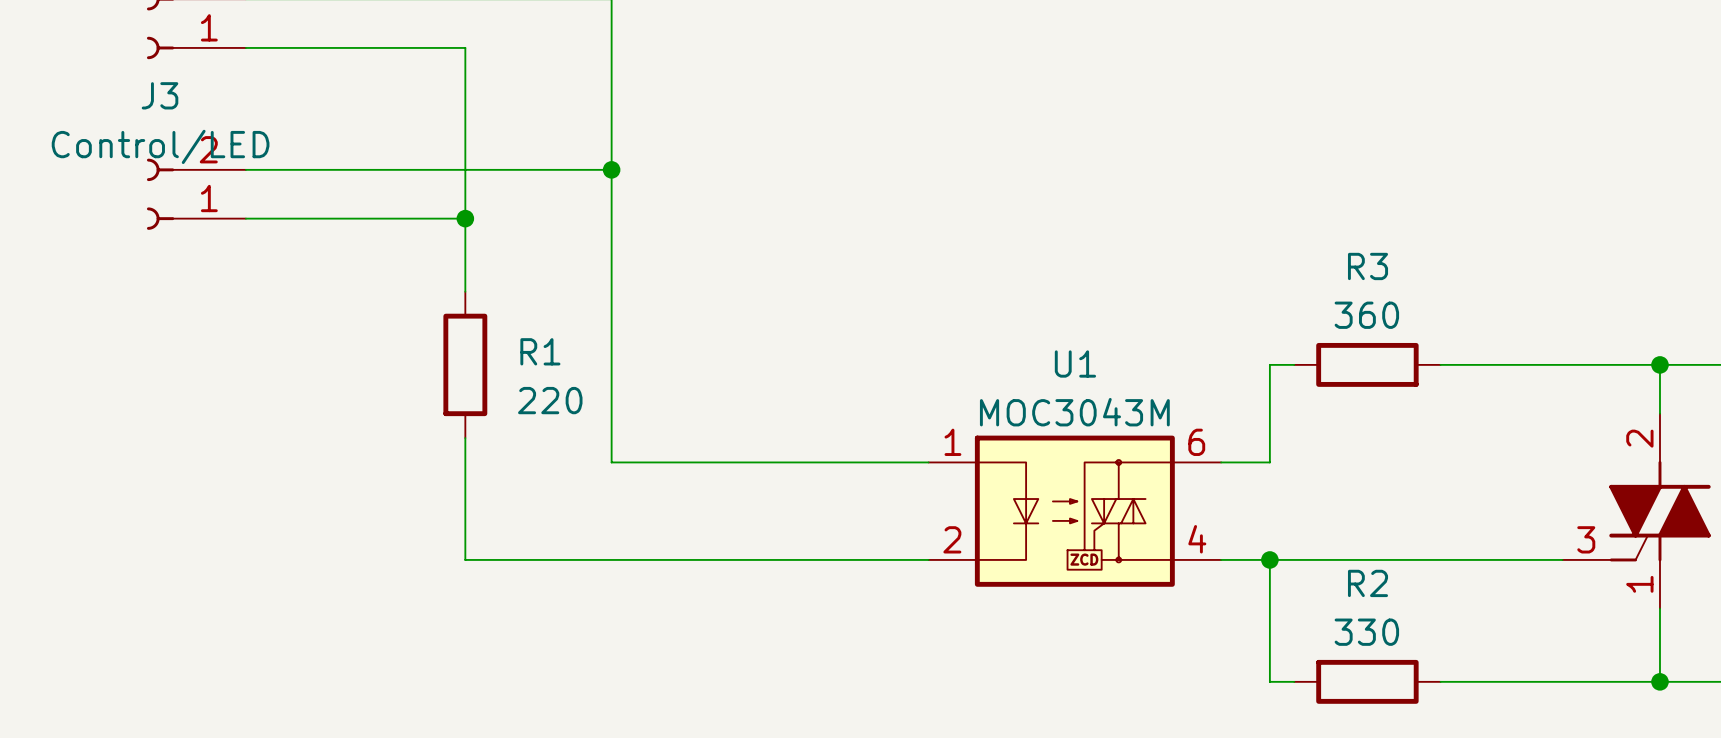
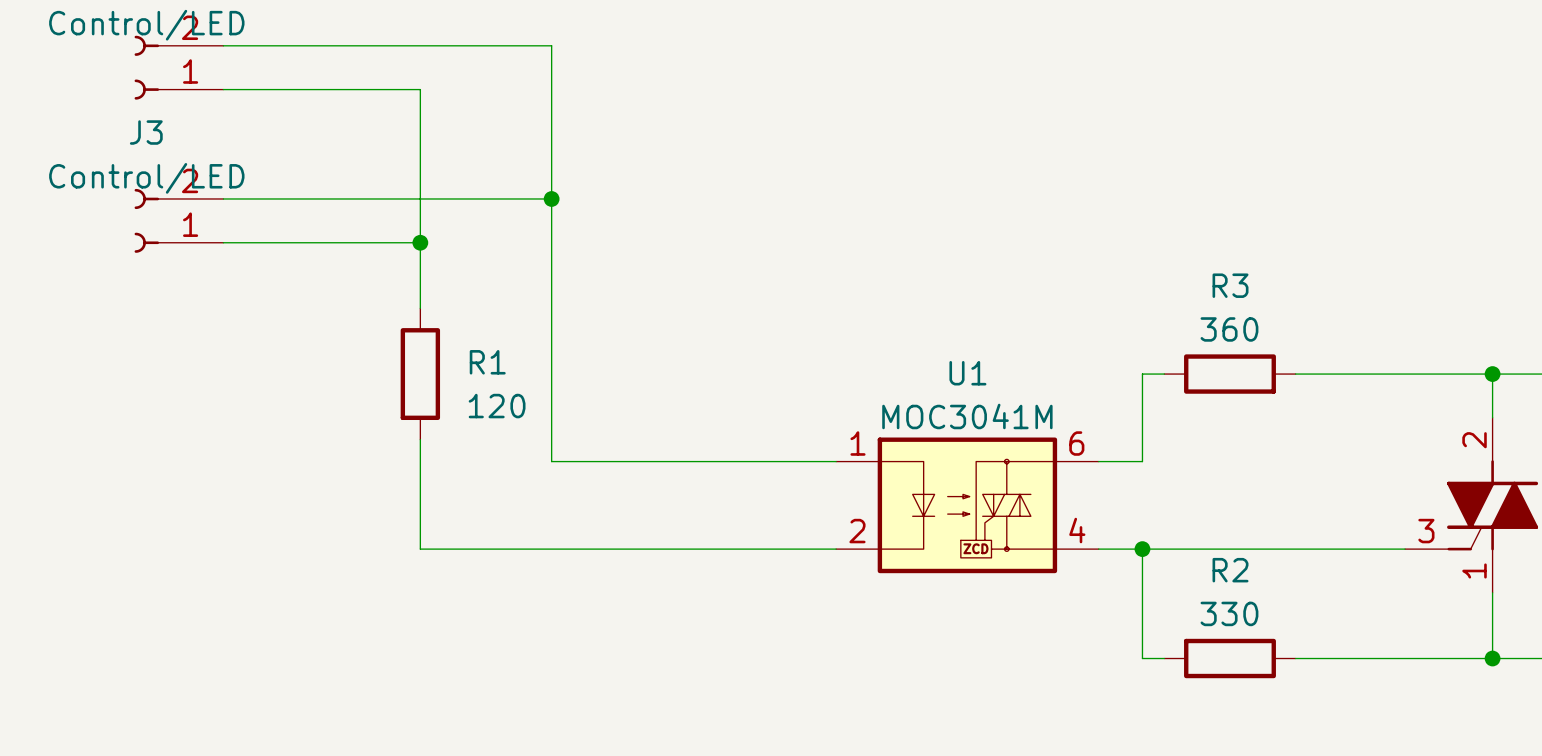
R1 value: 220 (550, 400) -> 120 (497, 406)
U1 value: MOC3043M (1074, 412) -> MOC3041M (967, 416)

